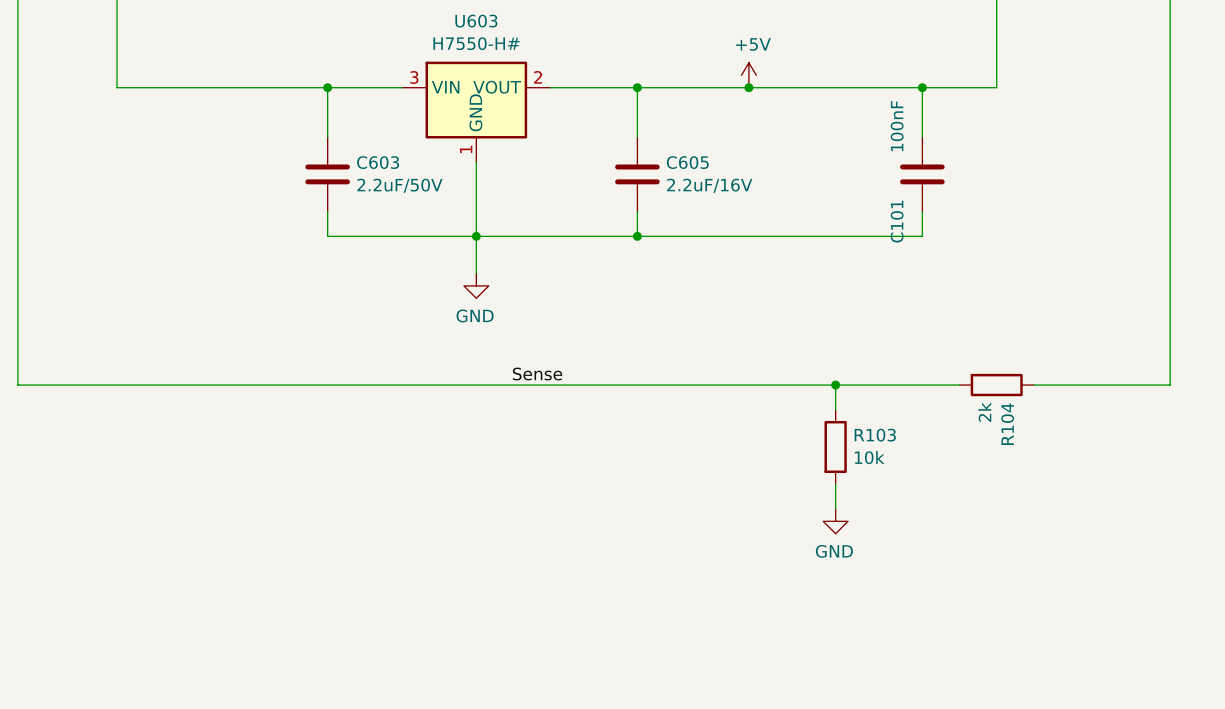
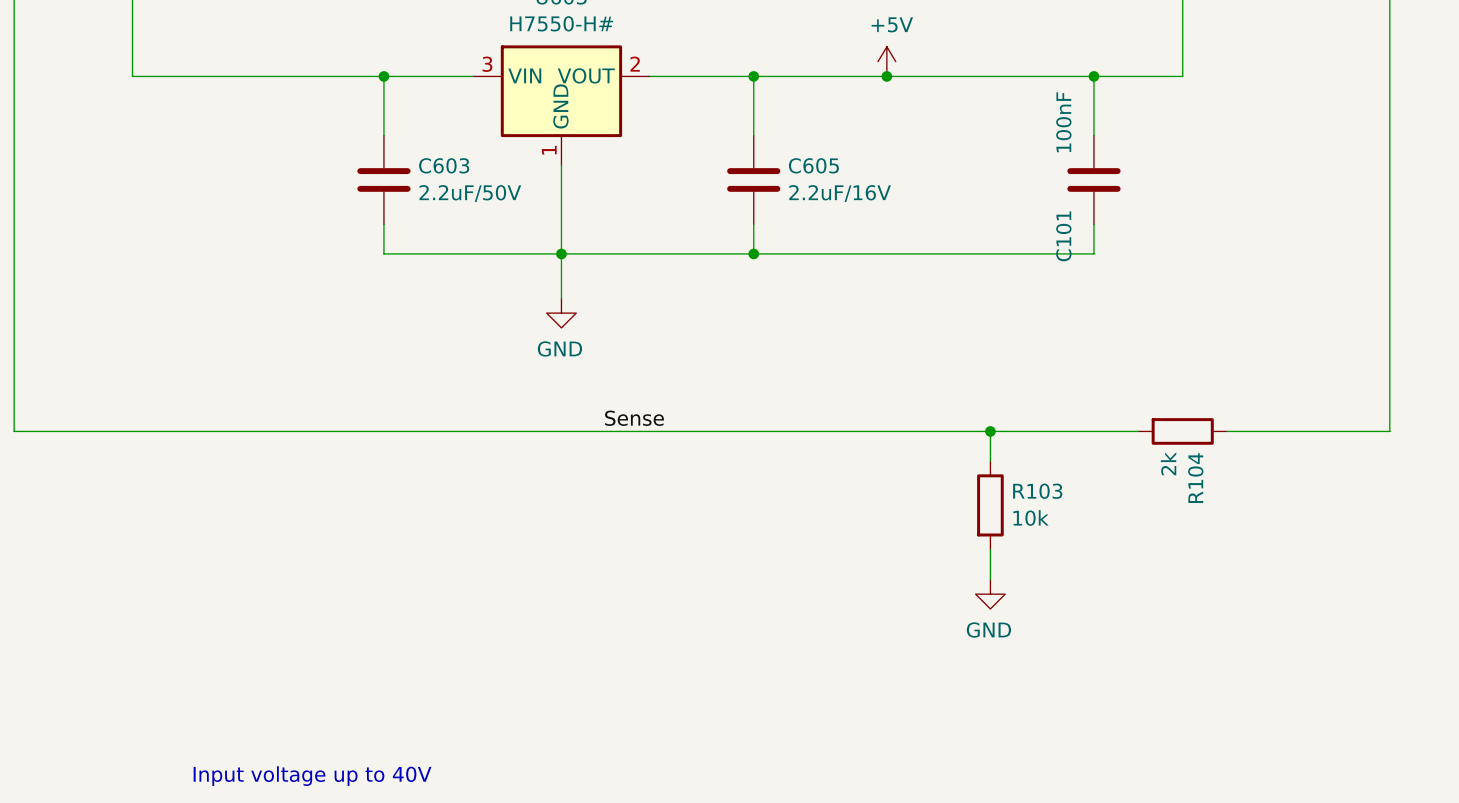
text: none -> Input voltage up to 40V (312, 776)

